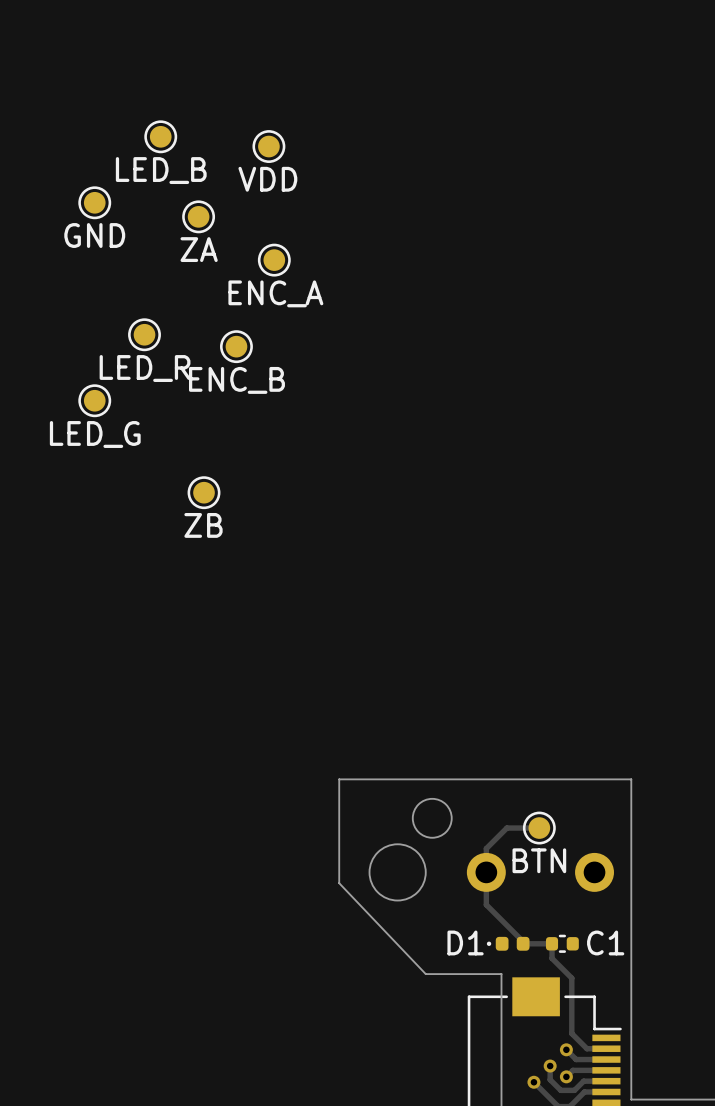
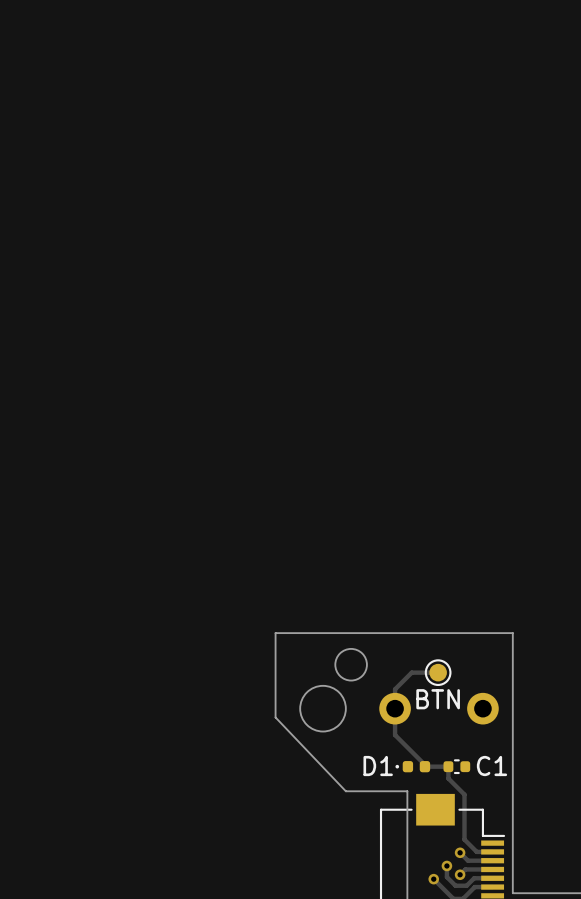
part: LED_B (160, 136) -> none
part: VDD (268, 146) -> none
part: GND (94, 202) -> none
part: ZA (198, 216) -> none
part: ENC_A (274, 260) -> none
part: LED_R (144, 334) -> none
part: ENC_B (236, 346) -> none
part: LED_G (94, 400) -> none
part: ZB (204, 492) -> none

